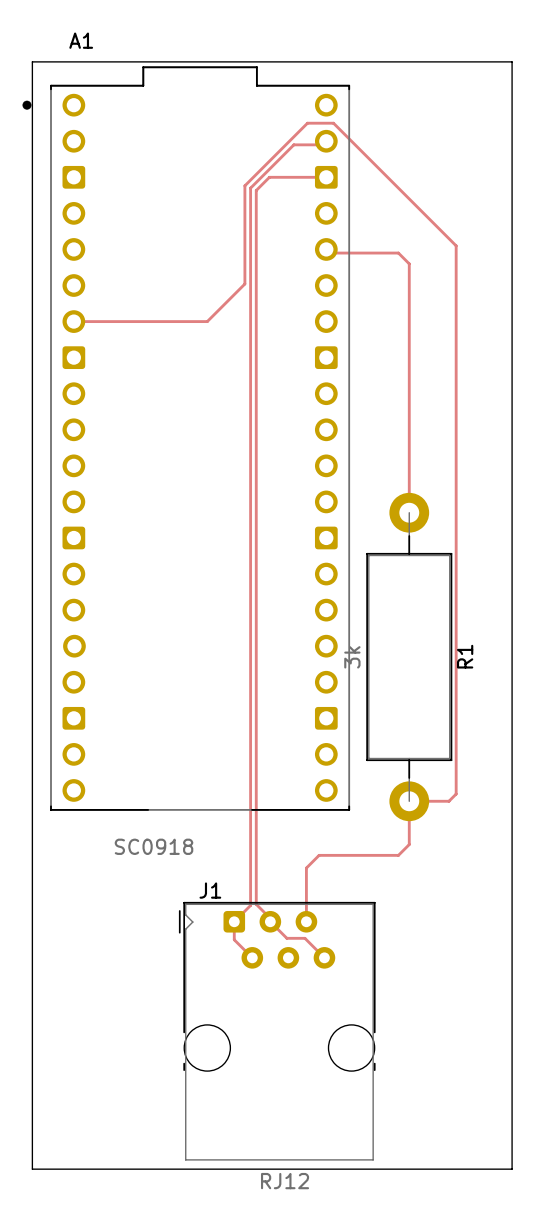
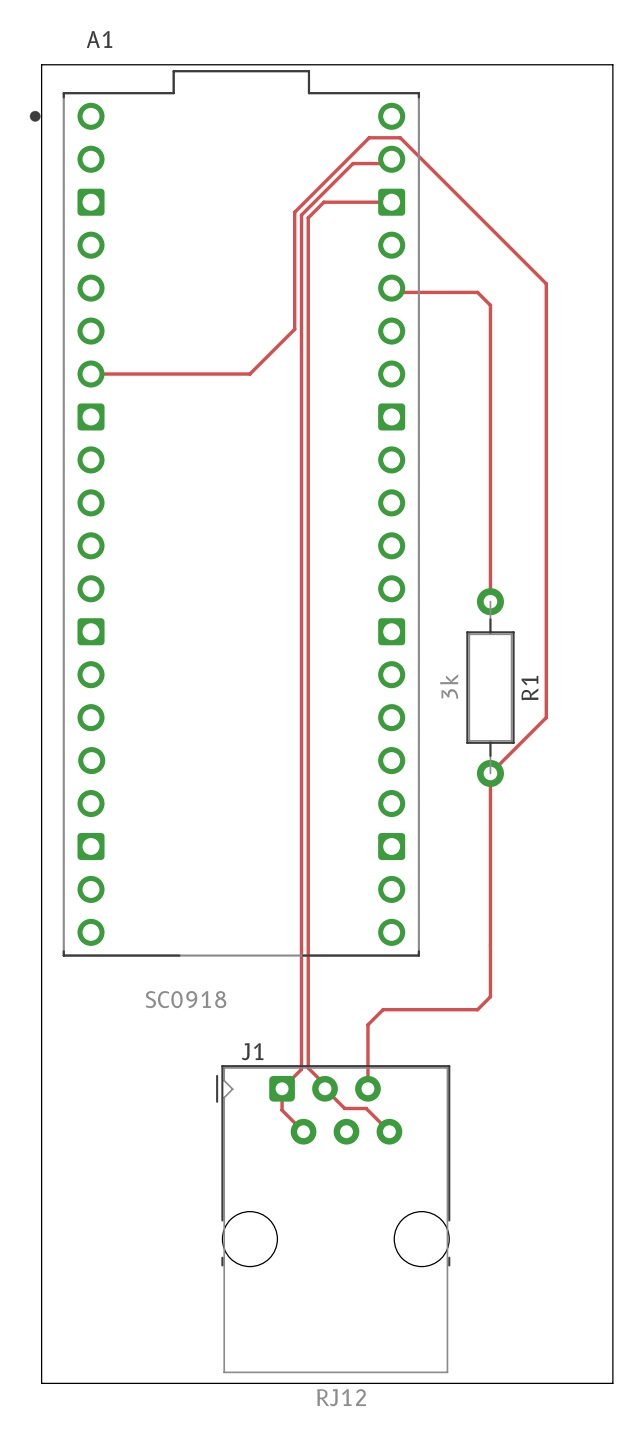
R1 footprint: [366, 492, 453, 822] -> [466, 588, 515, 788]
top track: (456, 610) (456, 794) (448, 801) (409, 801) -> (546, 717) (490, 773) (490, 945)

